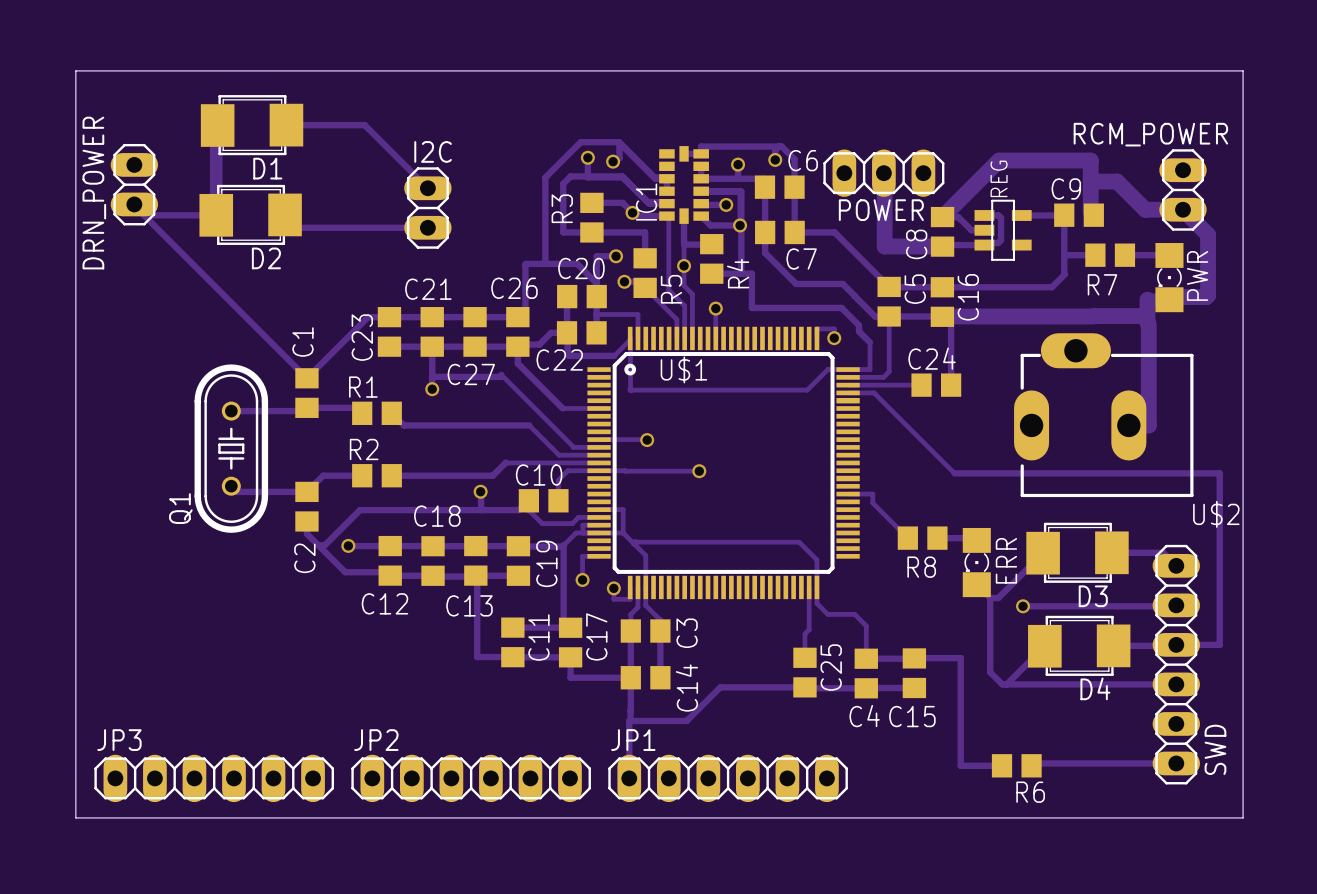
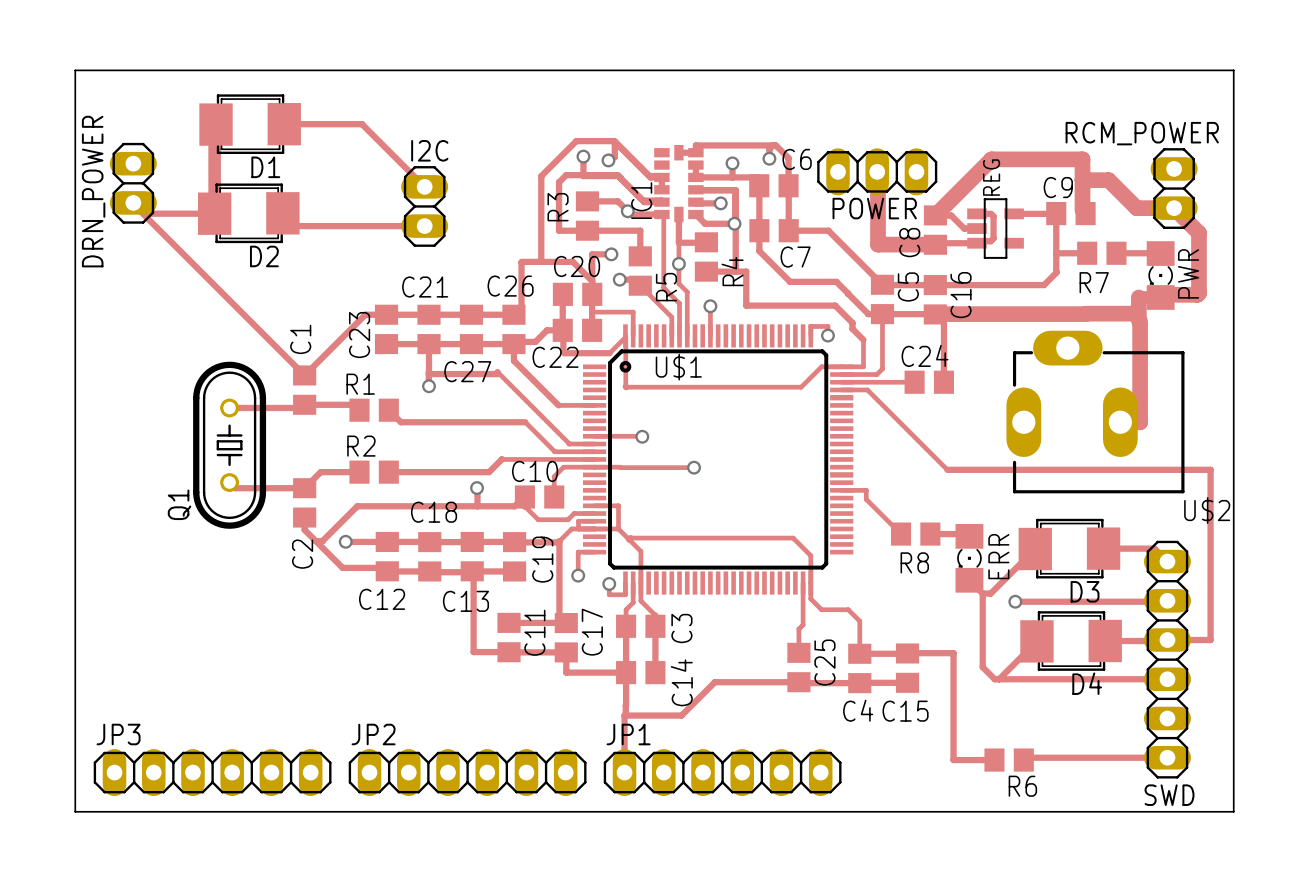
SWD name rotation: 0° (1215, 749) -> 90° clockwise (1169, 795)
SWD name position: SWD (1215, 749) -> SWD (1169, 795)

